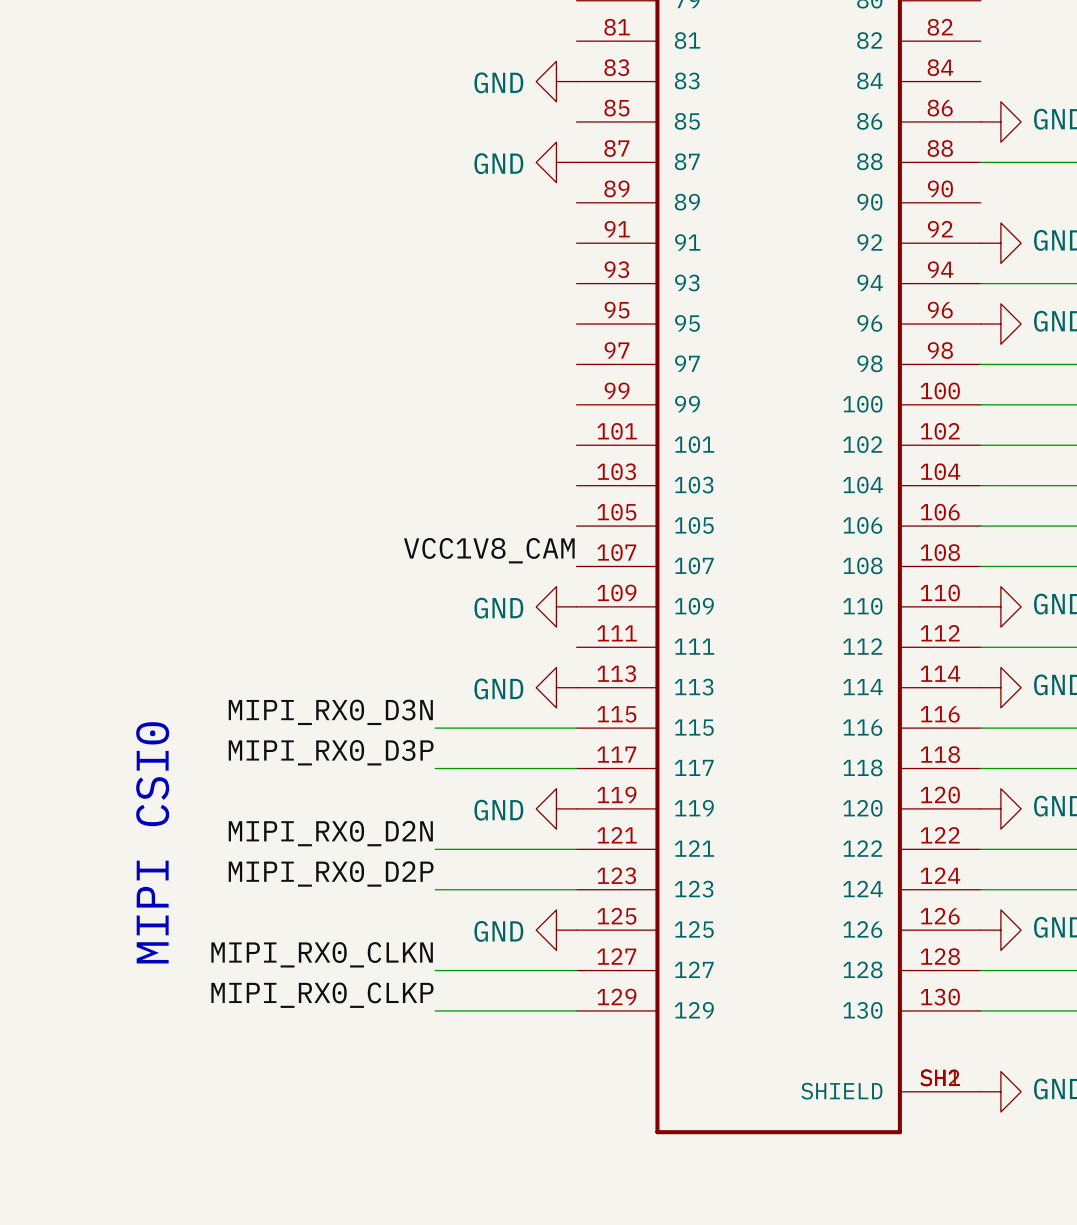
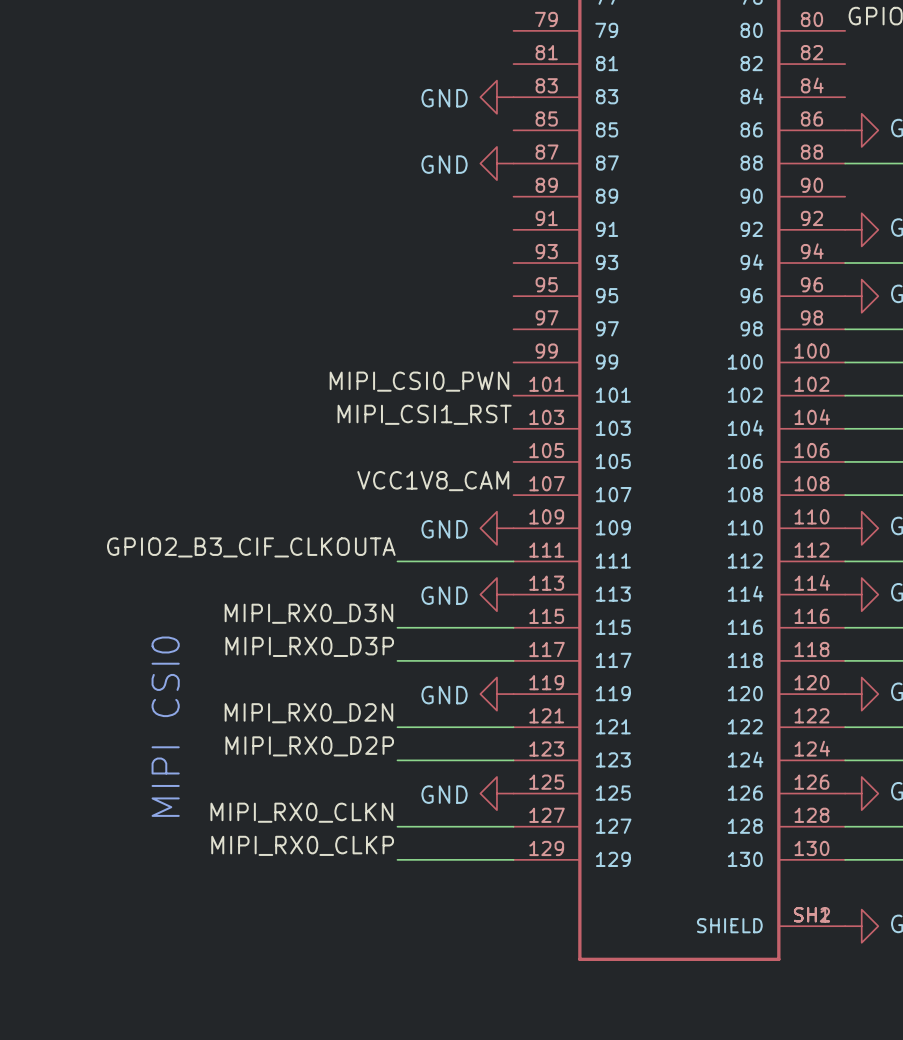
label: none -> MIPI_CSI0_PWN (419, 381)
label: none -> MIPI_CSI1_RST (424, 414)
label: none -> GPIO2_B3_CIF_CLKOUTA (251, 547)
wire: none -> (397, 561) (513, 561)

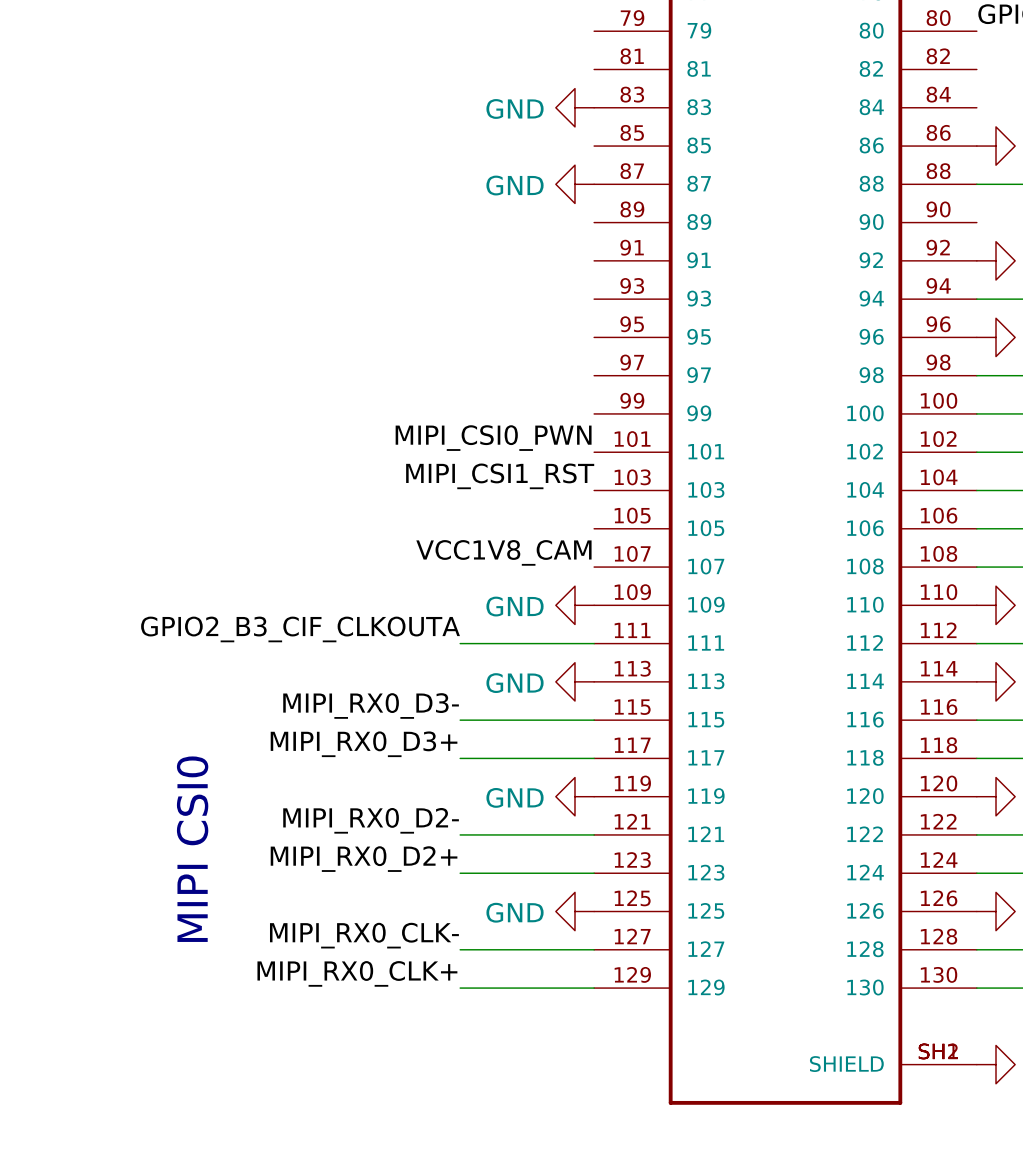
label: MIPI_RX0_D3N (308, 613) -> MIPI_RX0_D3- (371, 705)
label: MIPI_RX0_D3P (309, 646) -> MIPI_RX0_D3+ (364, 744)
label: MIPI_RX0_D2N (308, 713) -> MIPI_RX0_D2- (371, 820)
label: MIPI_RX0_D2P (309, 746) -> MIPI_RX0_D2+ (364, 859)
label: MIPI_RX0_CLKN (301, 812) -> MIPI_RX0_CLK- (364, 935)
label: MIPI_RX0_CLKP (302, 845) -> MIPI_RX0_CLK+ (357, 973)

